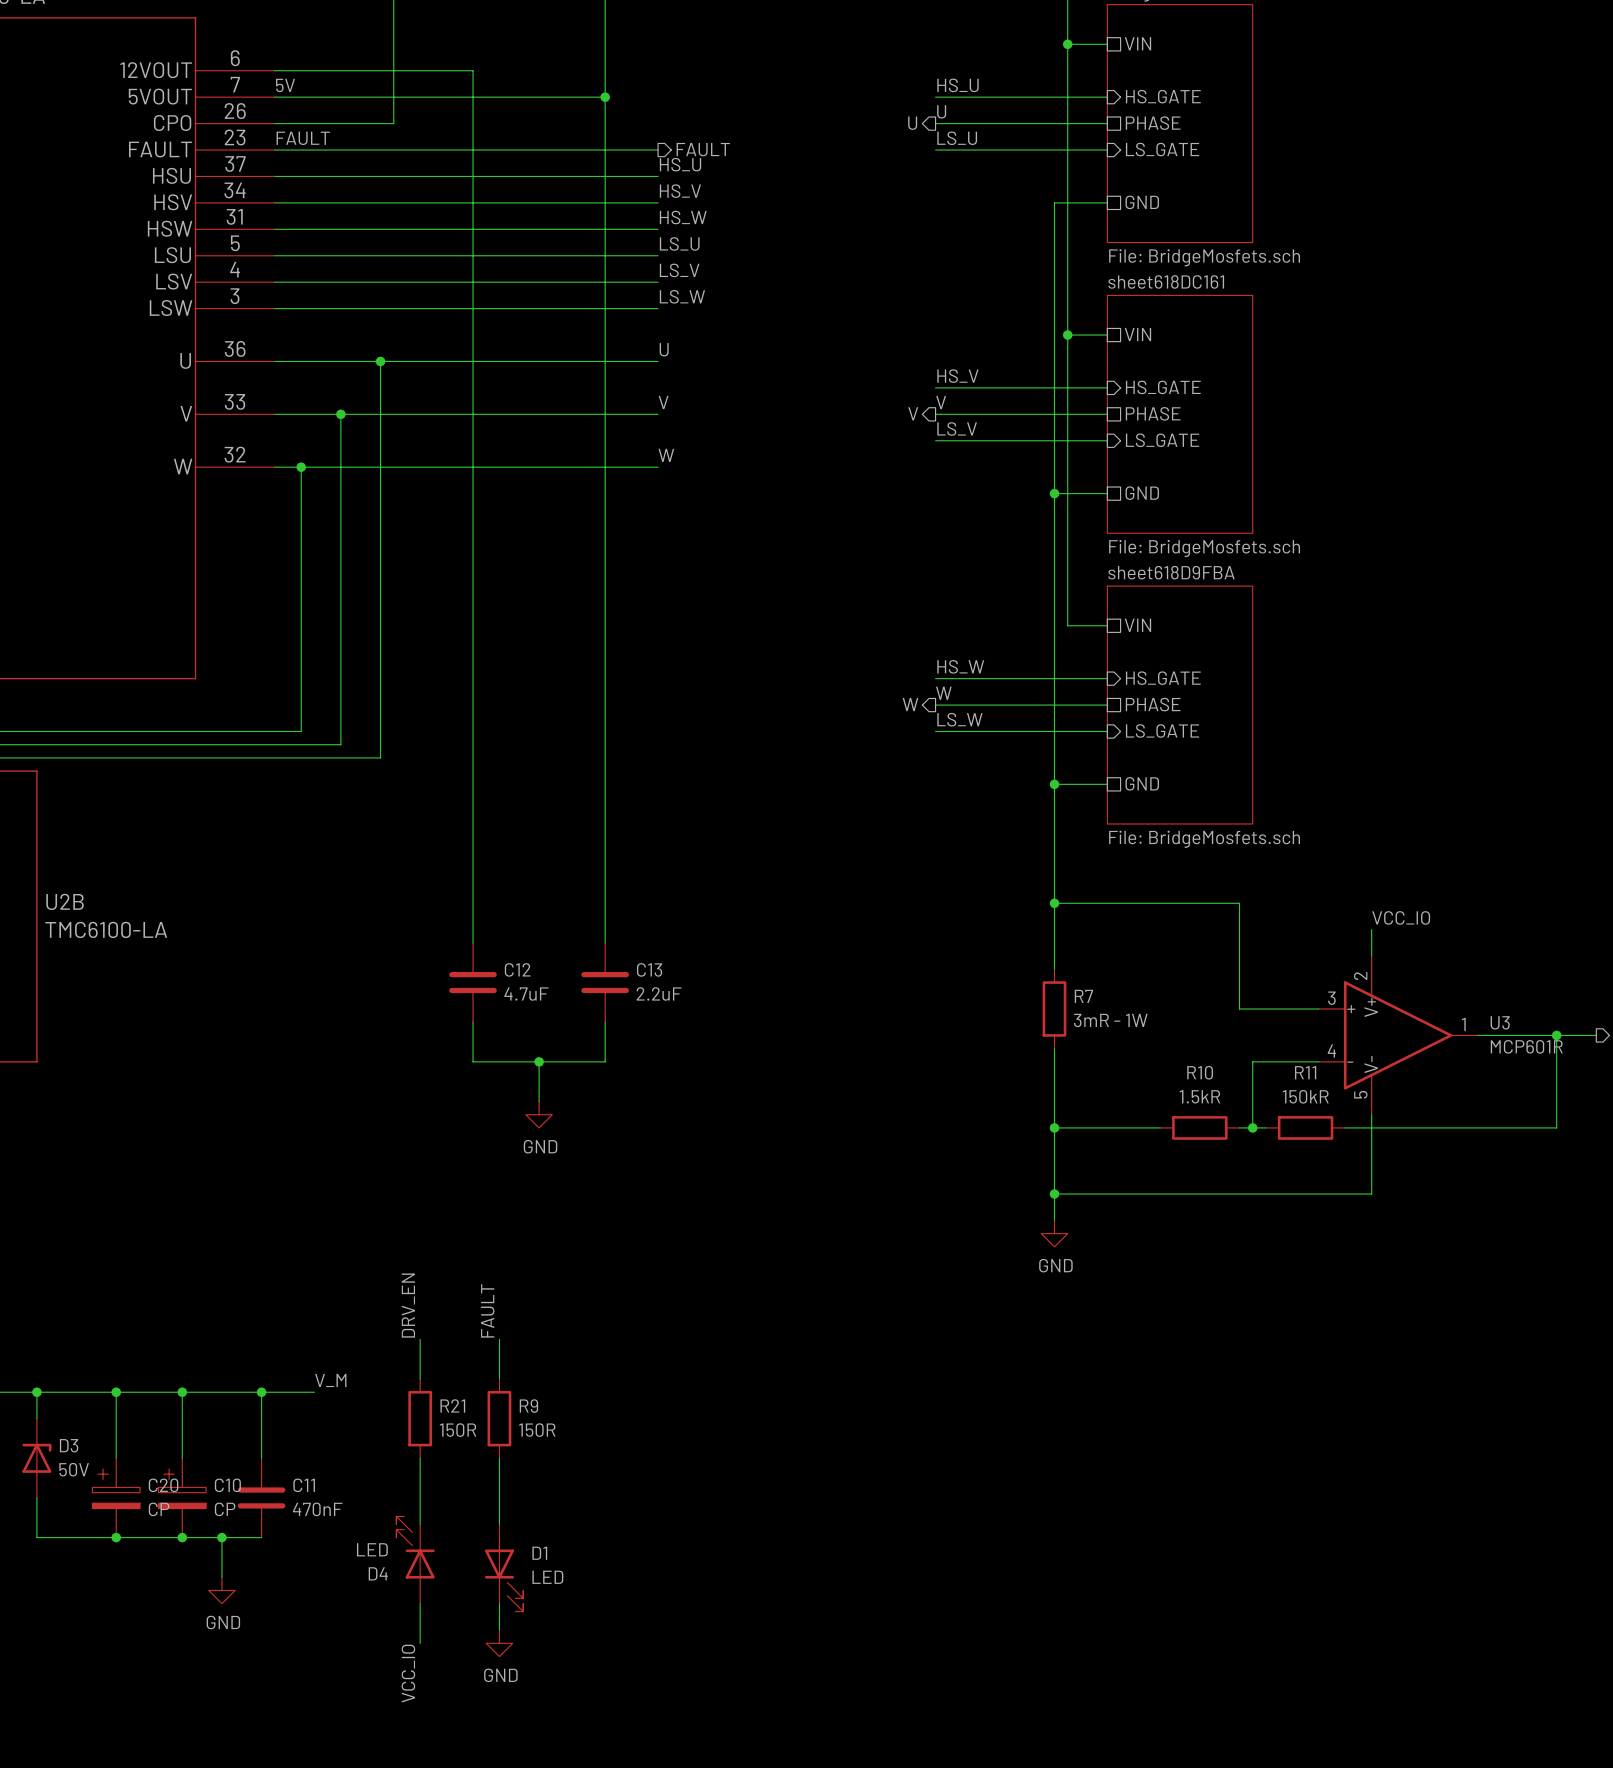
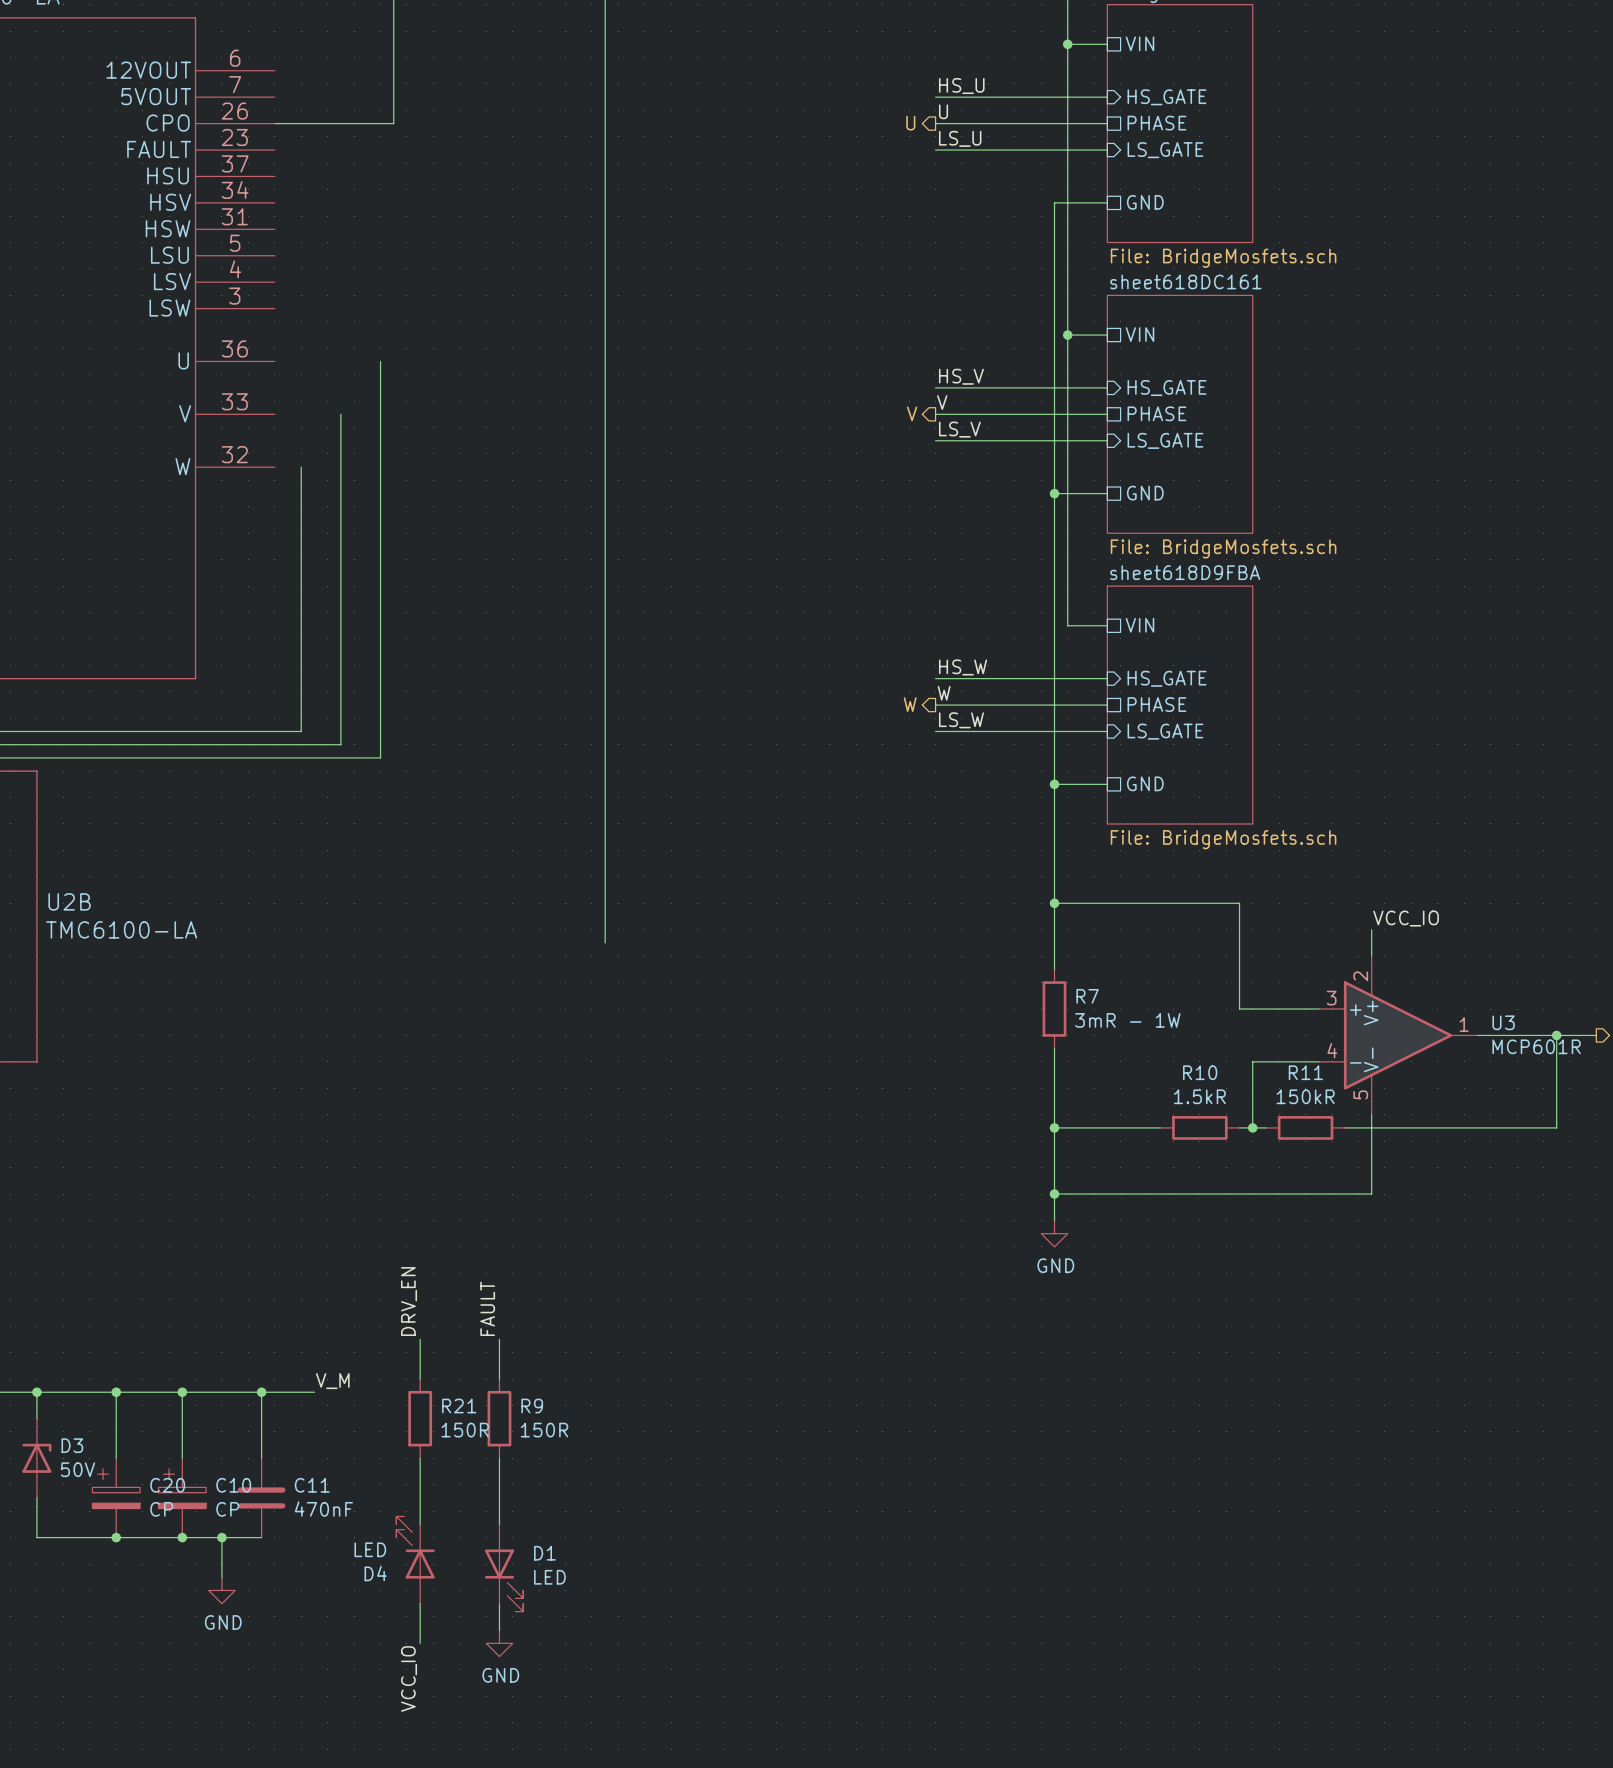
wire: (274, 70) (473, 70) (473, 942) -> none
label: 5V (285, 85) -> none
wire: (274, 97) (605, 97) -> none
junction: (605, 97) -> none
label: FAULT (303, 138) -> none
hierarchical label: FAULT (703, 149) -> none
wire: (274, 150) (658, 150) -> none
label: HS_U (680, 164) -> none
wire: (274, 176) (658, 176) -> none
label: HS_V (680, 191) -> none
wire: (274, 202) (658, 202) -> none
label: HS_W (683, 217) -> none
wire: (274, 229) (658, 229) -> none
label: LS_U (679, 243) -> none
wire: (274, 255) (658, 255) -> none
label: LS_V (679, 270) -> none
wire: (274, 282) (658, 282) -> none
label: LS_W (682, 296) -> none
wire: (274, 308) (658, 308) -> none
label: U (664, 349) -> none
wire: (274, 361) (658, 361) -> none
junction: (380, 361) -> none
label: V (663, 402) -> none
wire: (274, 414) (658, 414) -> none
junction: (340, 414) -> none
label: W (666, 455) -> none
wire: (274, 467) (658, 467) -> none
junction: (301, 467) -> none
C12: 4.7uF (473, 982) -> none
C13: 2.2uF (605, 982) -> none
wire: (473, 1022) (473, 1061) (605, 1061) (605, 1022) -> none
wire: (539, 1061) (539, 1101) -> none
junction: (539, 1061) -> none
power symbol: GND (539, 1114) -> none

